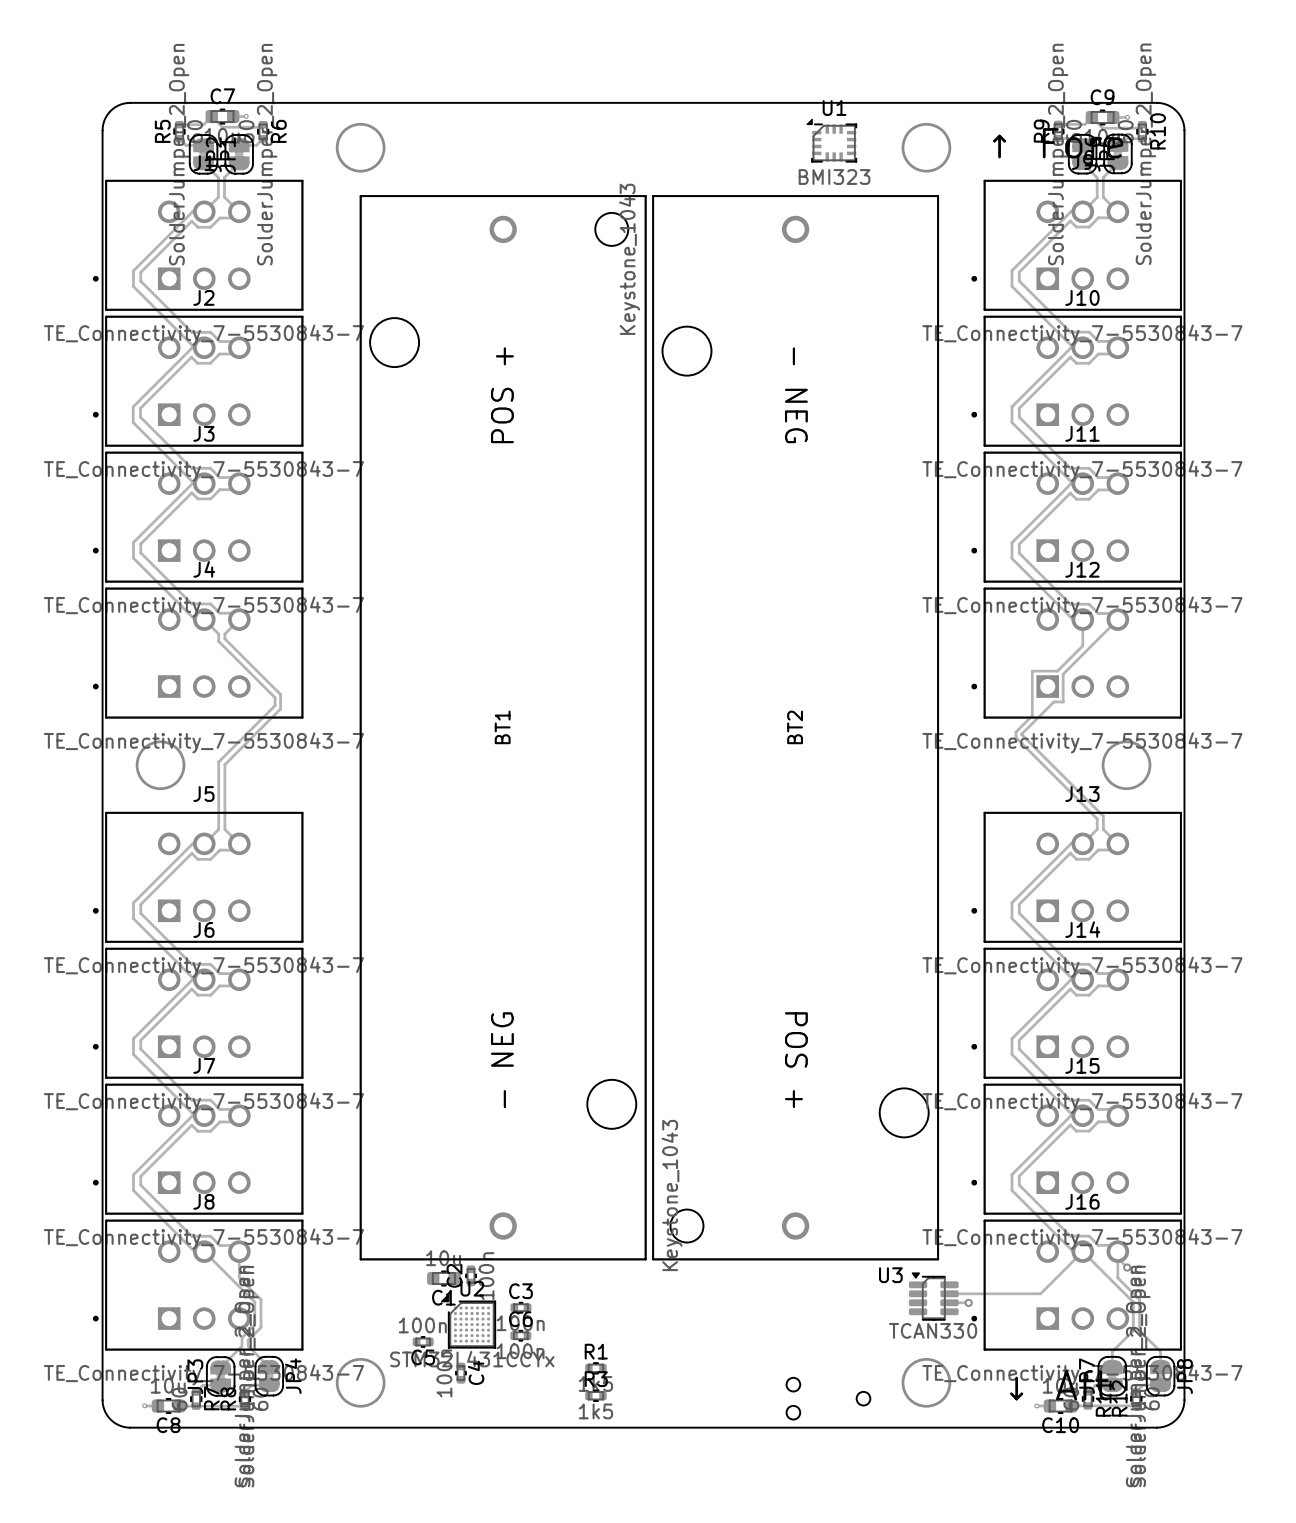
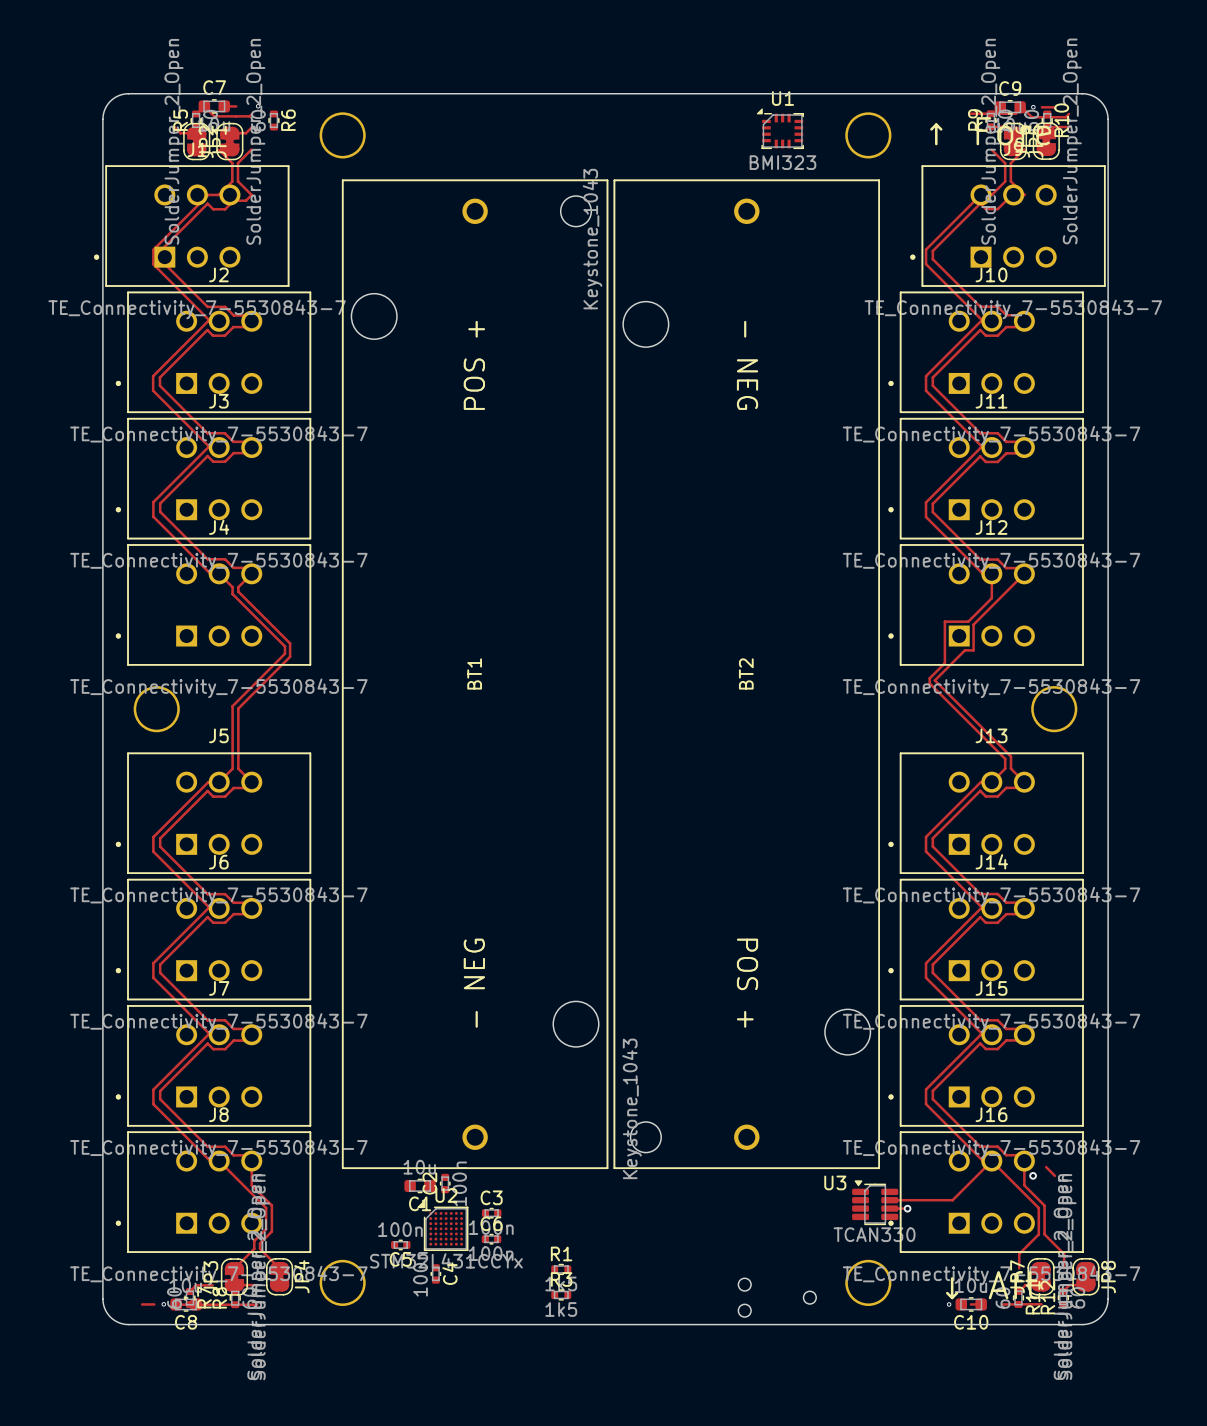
via position: (246, 116) -> (258, 106)
C9 position: (1102, 117) -> (1010, 107)
via position: (1127, 117) -> (1033, 107)
track: (179, 124) (202, 124) -> none
track: none -> (969, 113) (990, 113)
R5 position: (179, 131) -> (196, 120)
R6 position: (263, 131) -> (273, 120)
R10 position: (1142, 131) -> (1047, 120)
track: (239, 162) (224, 177) (224, 197) (239, 211) -> (251, 149) (237, 163) (237, 181) (251, 194)
track: (1117, 162) (1103, 177) (1103, 197) (1117, 211) -> (1024, 149) (1010, 163) (1010, 181) (1024, 194)
track: (203, 163) (218, 177) (218, 197) (204, 211) -> (218, 149) (232, 163) (232, 181) (218, 194)
track: (1082, 163) (1097, 177) (1097, 197) (1082, 211) -> (991, 149) (1005, 163) (1005, 181) (991, 194)
track: (204, 211) (192, 211) (133, 270) (133, 286) (194, 347) (204, 347) -> (219, 194) (208, 194) (153, 249) (153, 264) (210, 321) (219, 321)
track: (239, 211) (233, 218) (219, 218) (210, 227) (197, 227) (191, 221) (140, 272) (140, 281) (191, 332) (210, 332) (219, 341) (233, 341) (239, 347) -> (251, 194) (245, 200) (233, 200) (225, 209) (213, 209) (207, 203) (160, 251) (160, 259) (207, 306) (225, 306) (233, 315) (245, 315) (251, 321)
track: (1082, 211) (1071, 211) (1011, 270) (1011, 286) (1073, 347) (1082, 347) -> (991, 194) (980, 194) (926, 249) (926, 264) (982, 321) (991, 321)
track: (1117, 211) (1111, 217) (1098, 217) (1089, 227) (1076, 227) (1070, 221) (1019, 272) (1019, 281) (1070, 332) (1089, 332) (1098, 341) (1111, 341) (1117, 347) -> (1024, 194) (1018, 200) (1006, 200) (997, 209) (985, 209) (980, 203) (932, 250) (932, 259) (980, 306) (997, 306) (1006, 315) (1018, 315) (1024, 321)
track: (204, 347) (192, 347) (133, 406) (133, 422) (194, 483) (204, 483) -> (218, 321) (208, 321) (153, 376) (153, 390) (210, 447) (218, 447)
track: (239, 347) (232, 354) (219, 354) (210, 363) (197, 363) (191, 357) (140, 408) (140, 417) (191, 468) (210, 468) (219, 477) (232, 477) (239, 483) -> (251, 321) (245, 327) (233, 327) (224, 335) (212, 335) (207, 330) (159, 377) (159, 385) (207, 433) (224, 433) (233, 441) (245, 441) (251, 447)
track: (1082, 347) (1071, 347) (1011, 406) (1011, 422) (1073, 483) -> (991, 321) (980, 321) (926, 376) (926, 390) (982, 447)
track: (1117, 347) (1111, 354) (1098, 354) (1089, 363) (1076, 363) (1070, 357) (1019, 408) (1019, 417) (1070, 468) (1089, 468) (1098, 477) (1111, 477) (1117, 483) (1111, 489) (1098, 489) (1089, 499) (1076, 499) (1070, 493) (1019, 544) (1019, 553) (1070, 604) (1089, 604) (1098, 613) (1111, 613) (1117, 619) -> (1024, 321) (1018, 327) (1006, 327) (997, 335) (985, 335) (980, 330) (932, 377) (932, 385) (980, 433) (997, 433) (1006, 441) (1018, 441) (1024, 447) (1018, 453) (1006, 453) (997, 461) (985, 461) (980, 456) (932, 503) (932, 512) (980, 559) (997, 559) (1006, 568) (1018, 568) (1024, 573)
J2 position: (198, 381) -> (213, 352)
J10 position: (1076, 381) -> (986, 352)
track: (204, 483) (192, 483) (133, 542) (133, 558) (194, 619) (204, 619) -> (219, 447) (208, 447) (153, 502) (153, 516) (210, 573) (219, 573)
track: (239, 483) (233, 489) (219, 489) (210, 498) (197, 498) (191, 492) (140, 543) (140, 552) (191, 603) (210, 603) (219, 613) (233, 613) (239, 619) -> (251, 447) (245, 453) (233, 453) (225, 461) (213, 461) (207, 456) (160, 503) (160, 511) (207, 559) (225, 559) (233, 567) (245, 567) (251, 573)
track: (1082, 483) (1071, 483) (1011, 542) (1011, 558) (1073, 619) (1082, 619) -> (991, 447) (980, 447) (926, 502) (926, 517) (982, 573) (991, 573)
J3 position: (198, 517) -> (213, 478)
J11 position: (1076, 517) -> (986, 478)
track: (204, 619) (218, 634) (218, 641) (275, 697) (275, 705) (218, 762) (218, 829) (204, 843) -> (219, 573) (232, 587) (232, 594) (284, 646) (284, 653) (232, 706) (232, 768) (219, 782)
track: (239, 619) (224, 634) (224, 638) (280, 694) (280, 708) (224, 764) (224, 829) (239, 843) -> (251, 573) (238, 587) (238, 591) (290, 643) (290, 656) (238, 708) (238, 768) (251, 782)
track: (1082, 619) (1082, 645) (1057, 671) (1034, 671) -> (991, 573) (991, 598) (968, 621)
track: (1117, 619) (1063, 674) (1063, 701) (1053, 701) (1021, 734) (1103, 816) (1103, 829) (1117, 843) (1111, 849) (1098, 849) (1089, 859) (1076, 859) (1070, 853) (1019, 904) (1019, 913) (1070, 964) (1089, 964) (1098, 973) (1111, 973) (1117, 979) (1111, 985) (1098, 985) (1089, 995) (1076, 995) (1070, 989) (1019, 1040) (1019, 1049) (1070, 1100) (1089, 1100) (1098, 1109) (1111, 1109) (1117, 1115) (1111, 1121) (1098, 1121) (1089, 1131) (1076, 1131) (1070, 1125) (1019, 1176) (1019, 1185) (1070, 1236) (1089, 1236) (1098, 1245) (1111, 1245) (1117, 1251) (1117, 1277) (1139, 1299) (1139, 1330) (1160, 1351) (1160, 1367) -> (1024, 573) (973, 624) (973, 650) (964, 650) (934, 680) (1010, 756) (1010, 768) (1024, 782) (1018, 787) (1006, 787) (997, 796) (985, 796) (980, 790) (932, 838) (932, 846) (980, 894) (997, 894) (1006, 902) (1018, 902) (1024, 908) (1018, 914) (1006, 914) (997, 922) (985, 922) (980, 917) (932, 964) (932, 972) (980, 1020) (997, 1020) (1006, 1028) (1018, 1028) (1024, 1034) (1018, 1040) (1006, 1040) (997, 1049) (985, 1049) (980, 1043) (932, 1090) (932, 1099) (980, 1146) (997, 1146) (1006, 1155) (1018, 1155) (1024, 1160) (1024, 1185) (1044, 1205) (1044, 1234) (1064, 1254) (1064, 1268)
J4 position: (198, 653) -> (213, 604)
J12 position: (1076, 653) -> (986, 604)
track: (1032, 671) (1032, 715) (1015, 732) (1015, 737) (1097, 818) (1097, 829) (1082, 843) (1071, 843) (1011, 902) (1011, 918) (1073, 979) -> (966, 621) (944, 621) (944, 663) (929, 678) (929, 683) (1005, 758) (1005, 768) (991, 782) (980, 782) (926, 836) (926, 851) (982, 908)
track: (204, 843) (192, 843) (133, 902) (133, 918) (194, 979) (204, 979) -> (219, 782) (208, 782) (153, 837) (153, 851) (210, 908) (219, 908)
track: (239, 843) (233, 850) (219, 850) (210, 859) (197, 859) (191, 853) (140, 904) (140, 913) (191, 964) (210, 964) (219, 973) (233, 973) (239, 979) -> (251, 782) (245, 788) (233, 788) (225, 796) (213, 796) (207, 791) (160, 838) (160, 846) (207, 894) (225, 894) (233, 902) (245, 902) (251, 908)
J5 position: (198, 877) -> (213, 813)
J13 position: (1076, 877) -> (986, 813)
track: (204, 979) (192, 979) (133, 1038) (133, 1054) (194, 1115) (204, 1115) -> (219, 908) (208, 908) (153, 963) (153, 977) (210, 1034) (219, 1034)
track: (239, 979) (233, 985) (219, 985) (210, 995) (197, 995) (191, 989) (140, 1040) (140, 1049) (191, 1100) (210, 1100) (219, 1109) (233, 1109) (239, 1115) -> (251, 908) (245, 914) (233, 914) (225, 922) (213, 922) (207, 917) (160, 964) (160, 972) (207, 1020) (225, 1020) (233, 1028) (245, 1028) (251, 1034)
track: (1082, 979) (1071, 979) (1011, 1038) (1011, 1054) (1073, 1115) -> (991, 908) (980, 908) (926, 963) (926, 977) (982, 1034)
J6 position: (198, 1013) -> (213, 939)
J14 position: (1076, 1013) -> (986, 939)
track: (204, 1115) (192, 1115) (133, 1174) (133, 1190) (194, 1251) (204, 1251) -> (219, 1034) (208, 1034) (153, 1089) (153, 1104) (210, 1161) (219, 1161)
track: (239, 1115) (233, 1121) (219, 1121) (210, 1131) (197, 1131) (191, 1125) (140, 1176) (140, 1185) (191, 1236) (210, 1236) (219, 1245) (233, 1245) (239, 1251) -> (251, 1034) (245, 1040) (233, 1040) (225, 1049) (213, 1049) (207, 1043) (160, 1091) (160, 1099) (207, 1146) (225, 1146) (233, 1155) (245, 1155) (251, 1161)
track: (1082, 1115) (1071, 1115) (1011, 1174) (1011, 1190) (1073, 1251) (1082, 1251) -> (991, 1034) (980, 1034) (926, 1089) (926, 1104) (982, 1160) (991, 1160)
J7 position: (198, 1149) -> (213, 1065)
J15 position: (1076, 1149) -> (986, 1065)
track: (204, 1251) (254, 1302) (254, 1324) (242, 1337) (242, 1346) (220, 1367) -> (219, 1161) (266, 1207) (266, 1229) (254, 1241) (254, 1248) (234, 1268)
track: (239, 1251) (239, 1277) (260, 1299) (260, 1327) (248, 1340) (248, 1346) (269, 1367) -> (251, 1161) (251, 1185) (271, 1205) (271, 1231) (260, 1243) (260, 1248) (279, 1268)
track: (1082, 1251) (1040, 1293) (1017, 1293) -> (991, 1161) (952, 1200)
track: (1082, 1251) (1133, 1302) (1133, 1330) (1112, 1351) (1112, 1367) -> (991, 1161) (1038, 1208) (1038, 1234) (1019, 1254) (1019, 1268)
via position: (1127, 1267) -> (1033, 1175)
J8 position: (198, 1285) -> (213, 1192)
J16 position: (1076, 1285) -> (986, 1192)
JP3 position: (220, 1376) -> (234, 1277)
JP4 position: (269, 1376) -> (279, 1276)
via position: (144, 1405) -> (163, 1304)
C8 position: (168, 1405) -> (186, 1304)
via position: (1036, 1405) -> (949, 1304)
C10 position: (1060, 1405) -> (971, 1304)
track: (1112, 1405) (1136, 1405) -> none
track: none -> (235, 1304) (257, 1304)

